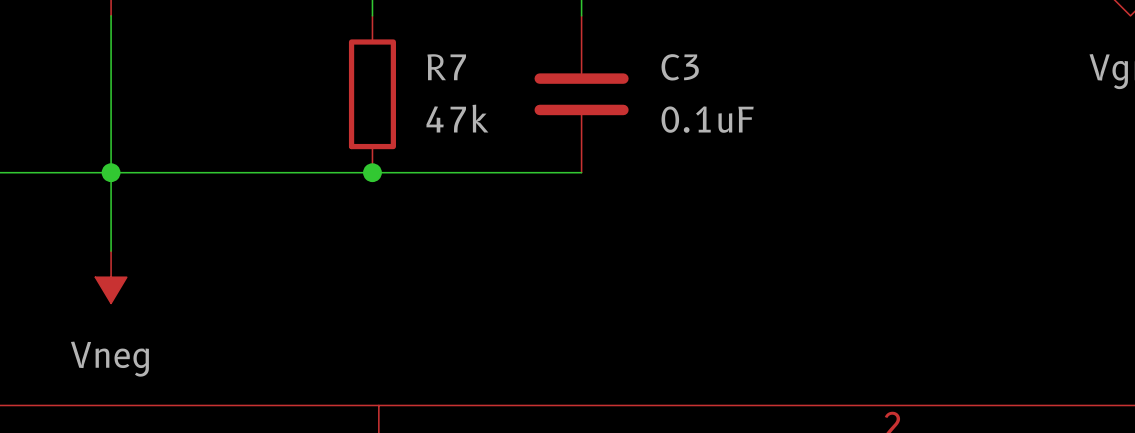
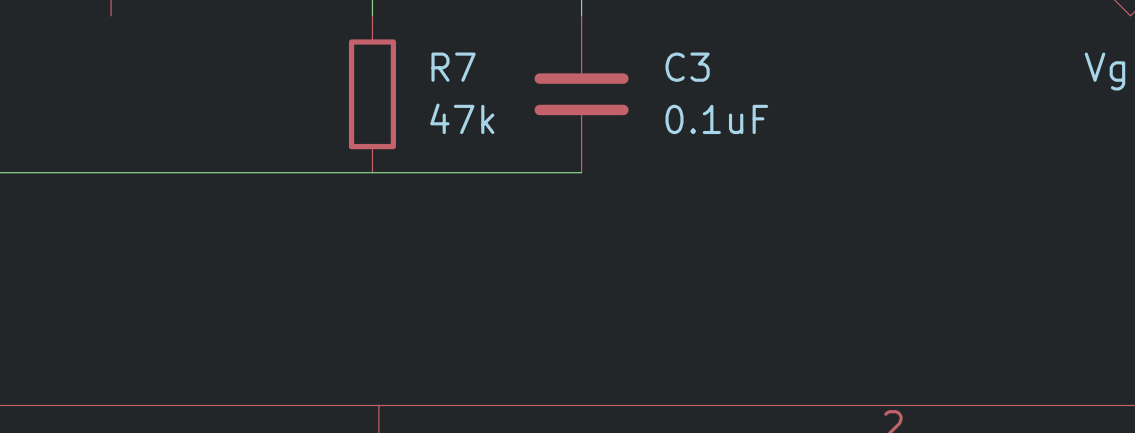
wire: (111, 15) (111, 251) -> none
junction: (111, 172) -> none
junction: (372, 172) -> none
power symbol: Vneg (111, 277) -> none

